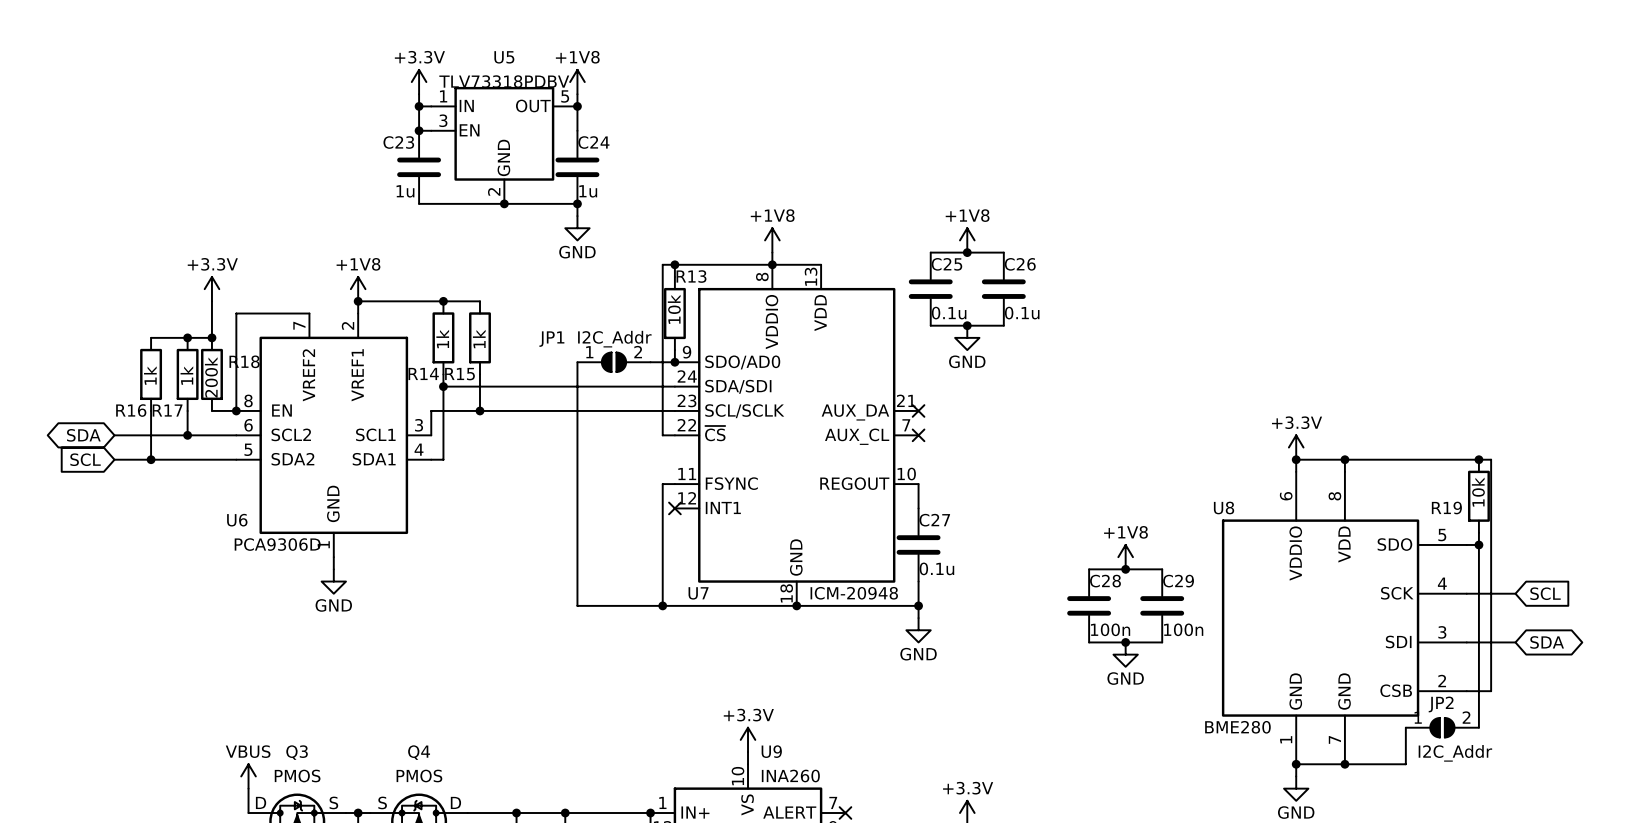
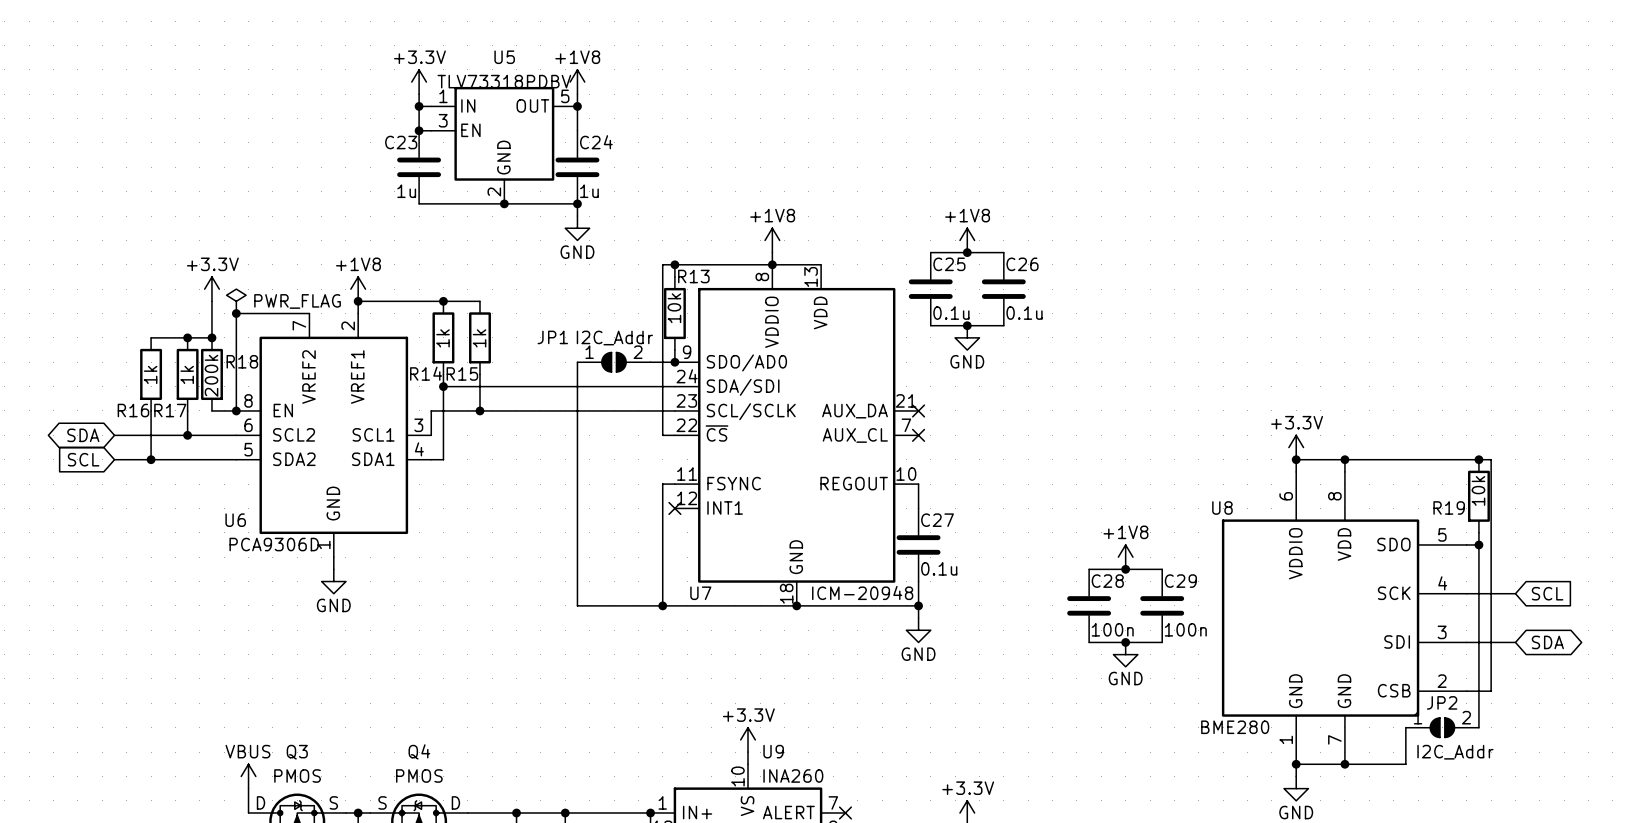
power symbol: none -> PWR_FLAG (236, 301)
junction: none -> (236, 313)

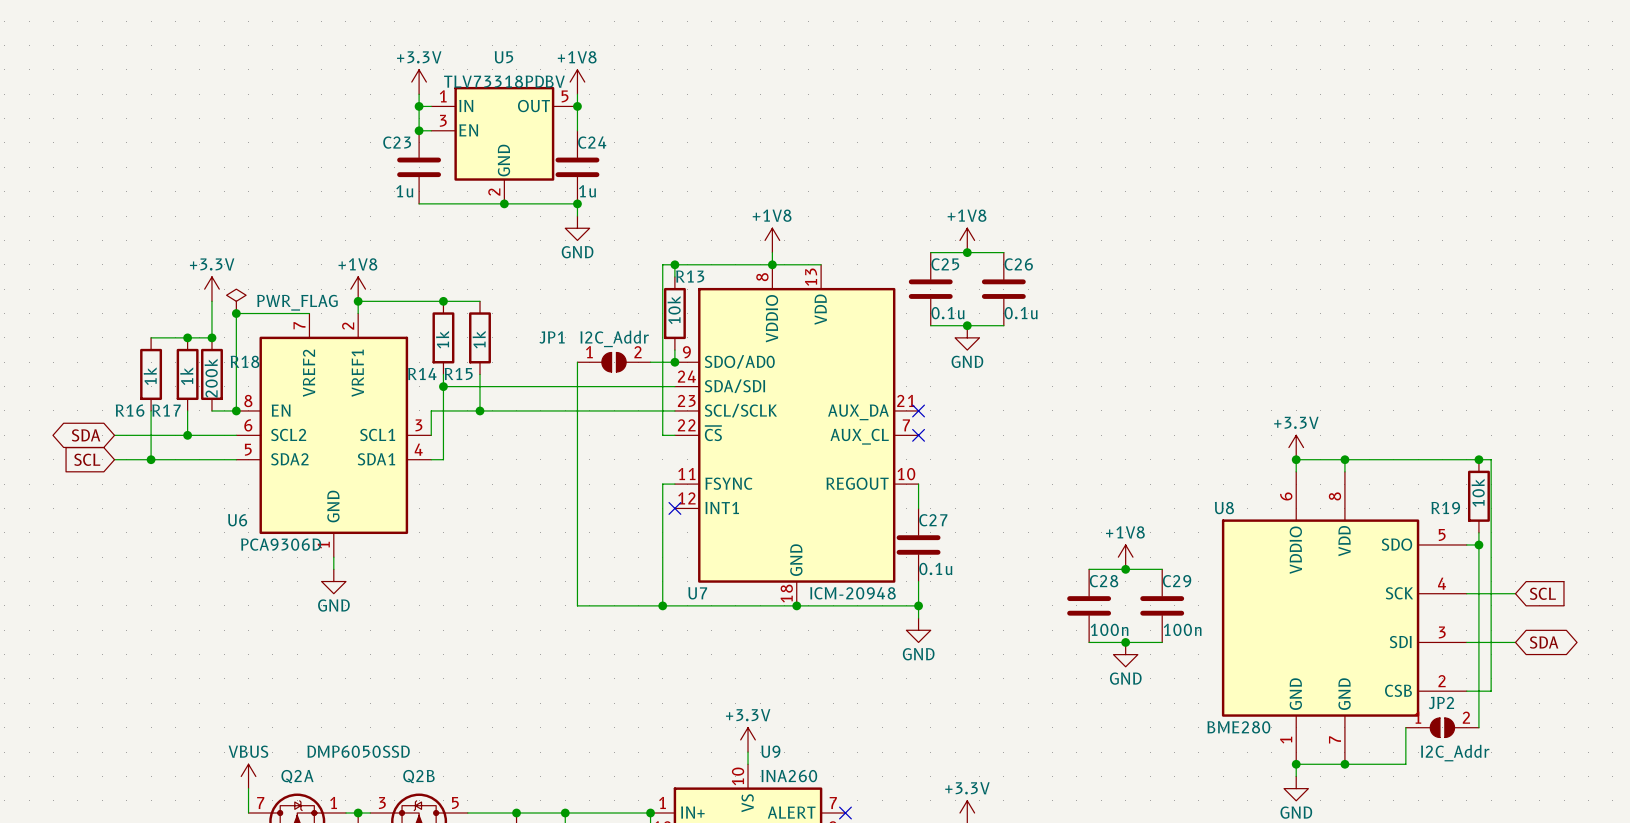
Q4 name: Q4 (419, 751) -> Q2B (418, 776)
Q3 name: Q3 (297, 752) -> Q2A (297, 776)
Q3 value: PMOS (297, 776) -> DMP6050SSD (358, 751)
Q4 value: PMOS (419, 776) -> none
Q3 pin number: none -> 7 (260, 803)
Q3 pin name: D (261, 802) -> none
Q3 pin name: S (333, 802) -> none
Q3 pin number: none -> 1 (333, 802)
Q4 pin name: S (382, 802) -> none
Q4 pin number: none -> 3 (382, 803)
Q4 pin name: D (455, 802) -> none
Q4 pin number: none -> 5 (455, 803)

